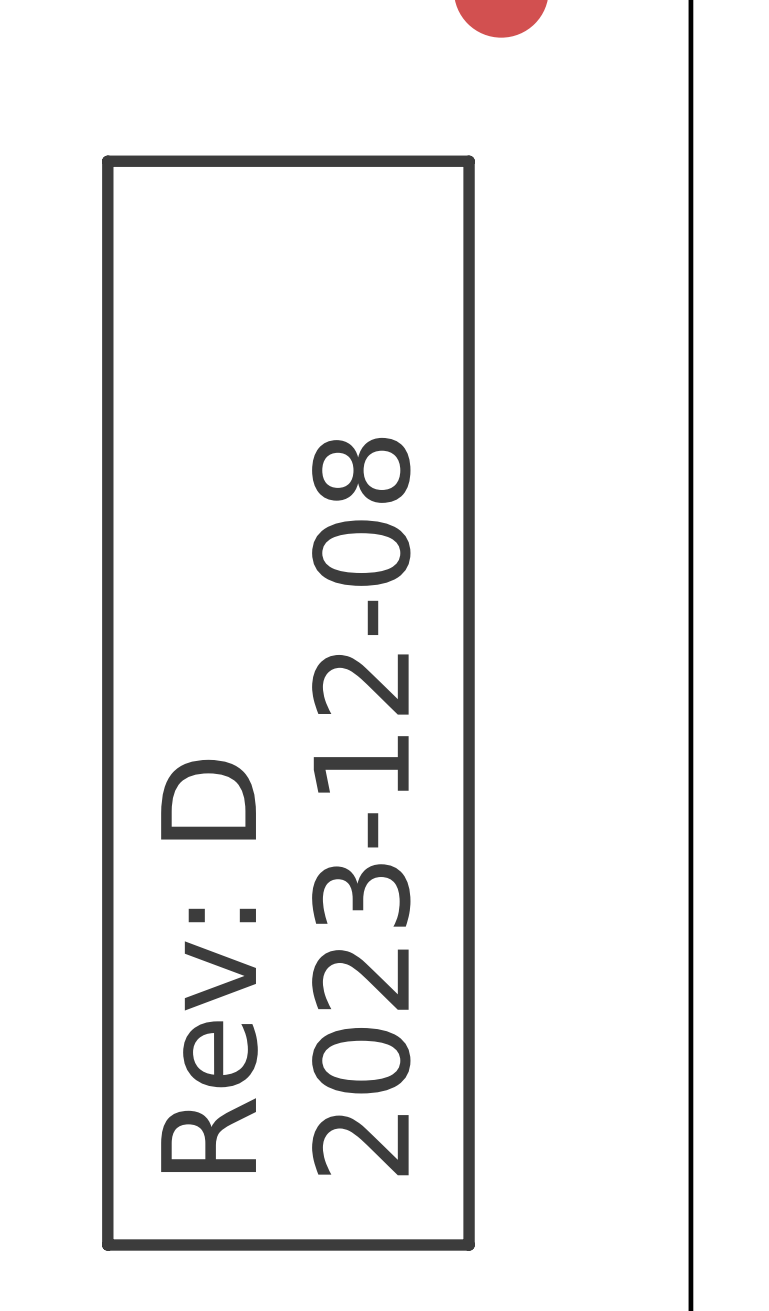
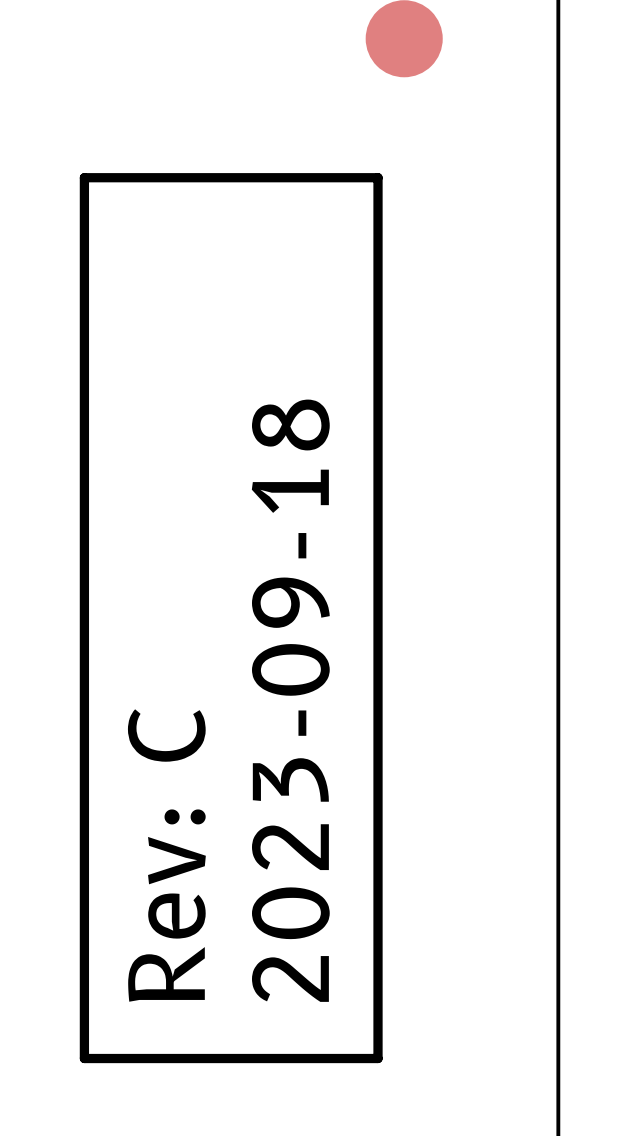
text: 2023-12-08 (361, 806) -> 2023-09-18 (290, 700)
text: Rev: D (209, 965) -> Rev: C (166, 855)

